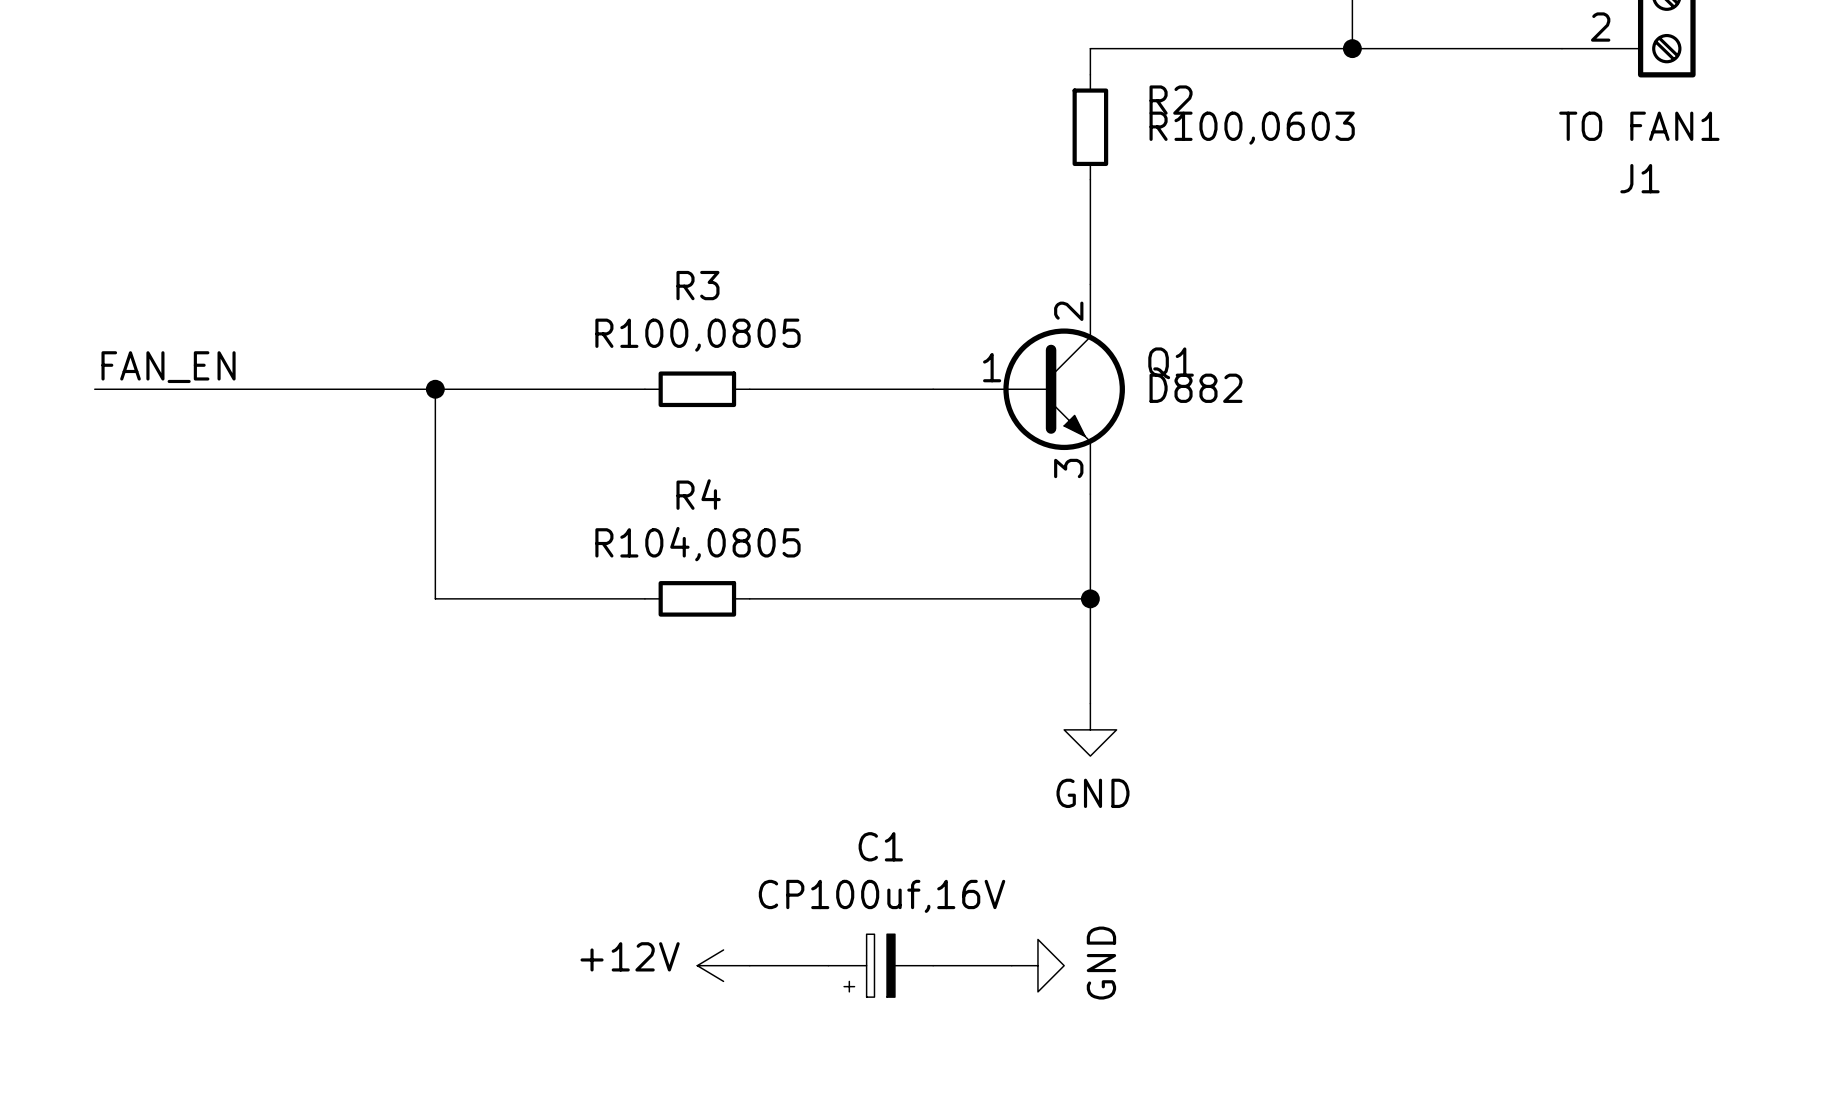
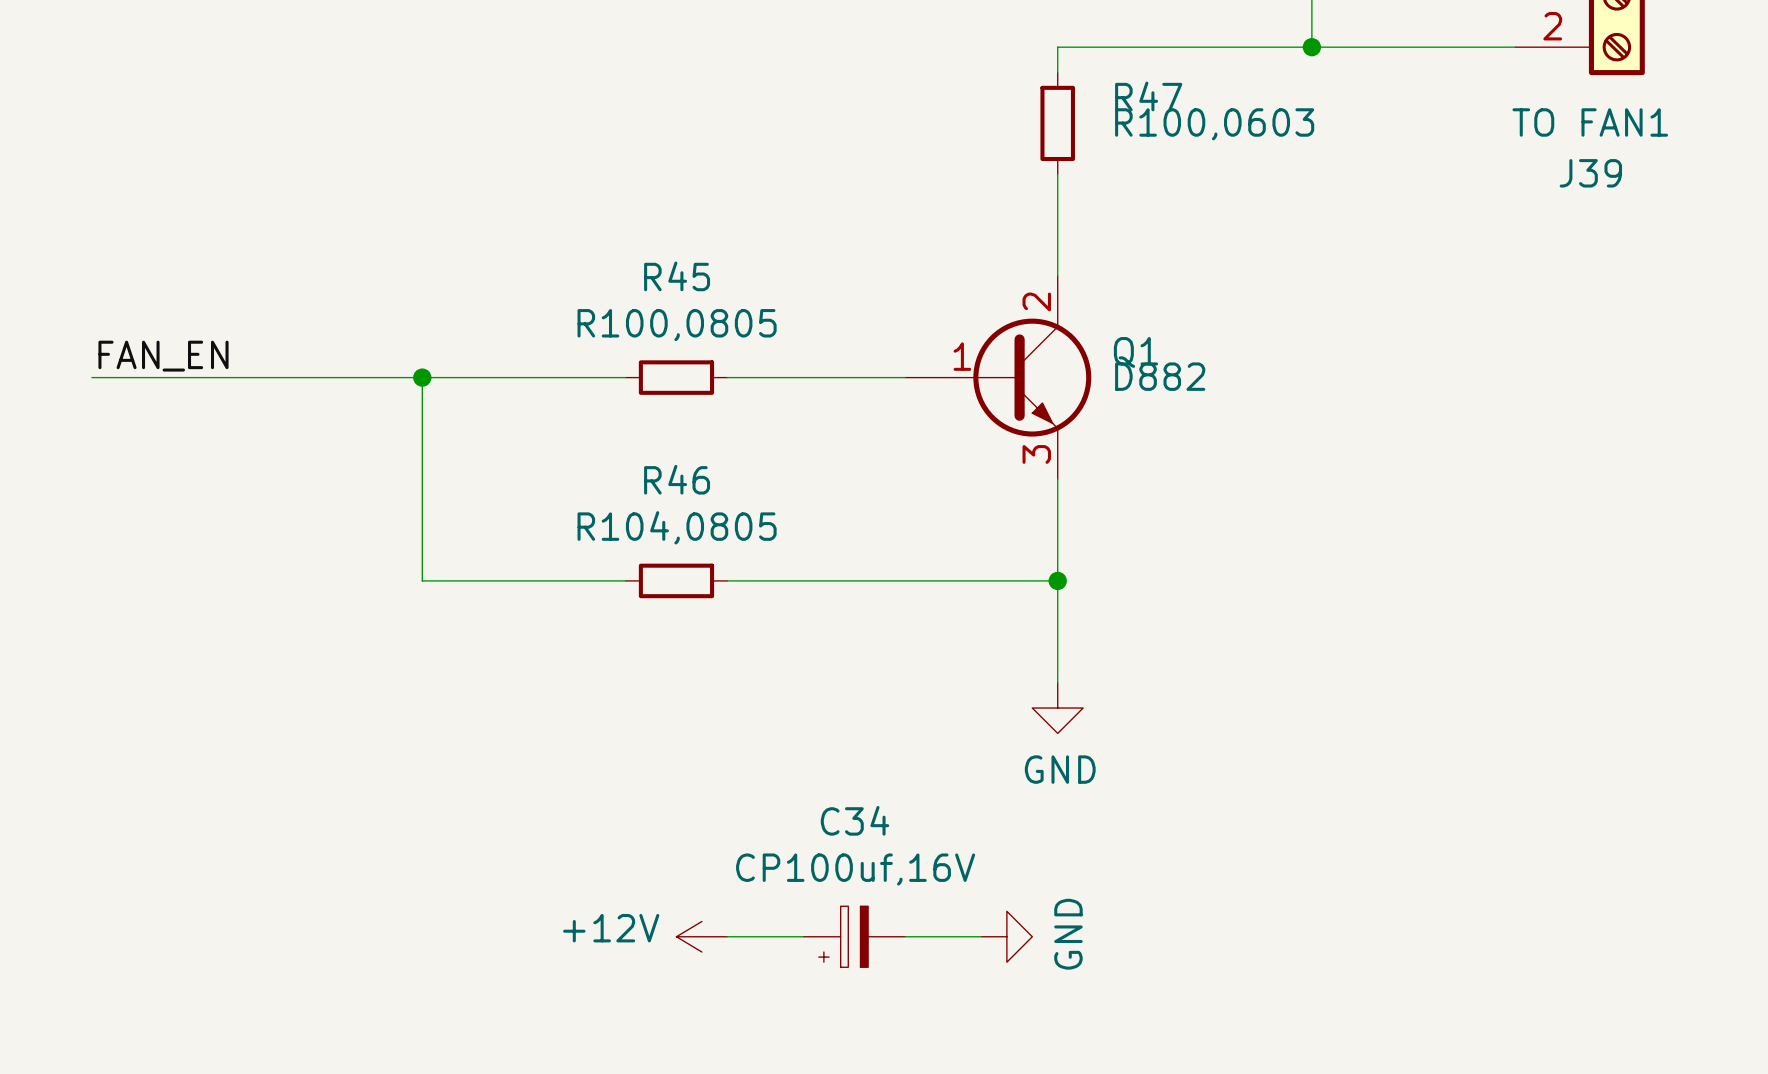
R2 name: R2 (1171, 100) -> R47 (1148, 96)
J1 name: J1 (1639, 178) -> J39 (1590, 173)
R3 name: R3 (697, 285) -> R45 (677, 276)
R4 name: R4 (698, 494) -> R46 (677, 479)
C1 name: C1 (880, 846) -> C34 (854, 820)

